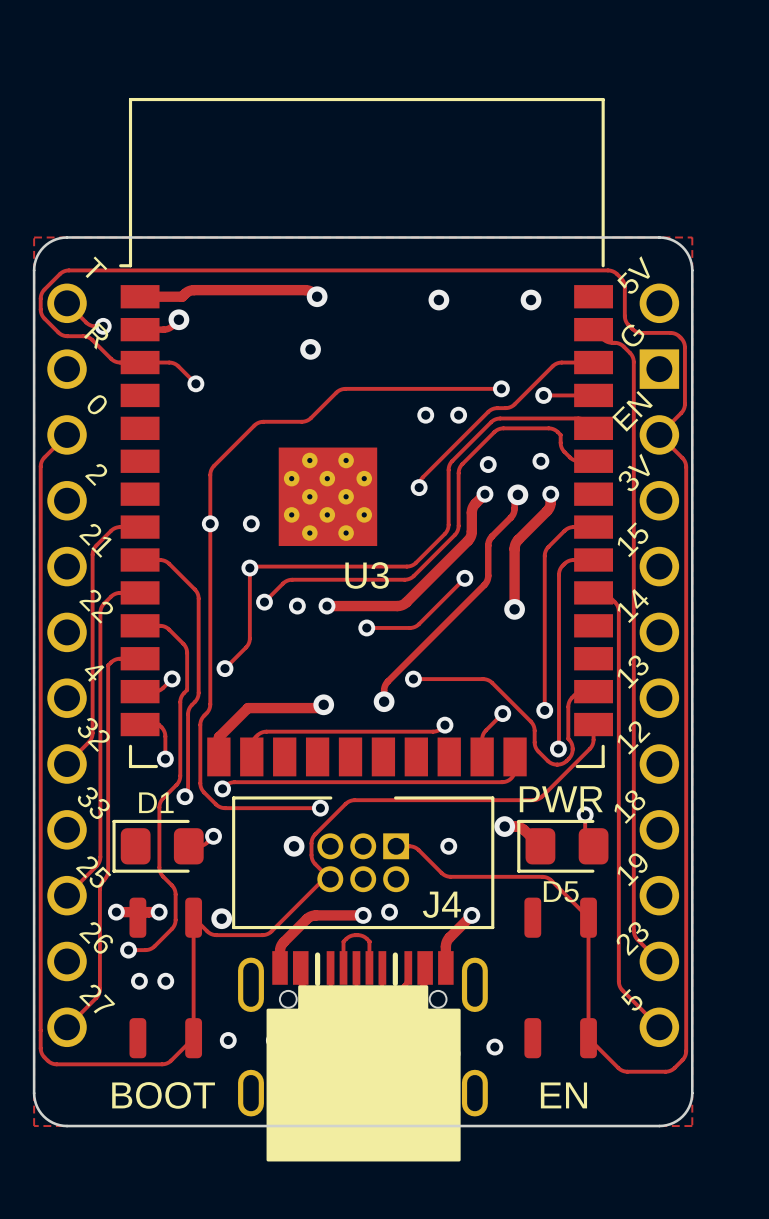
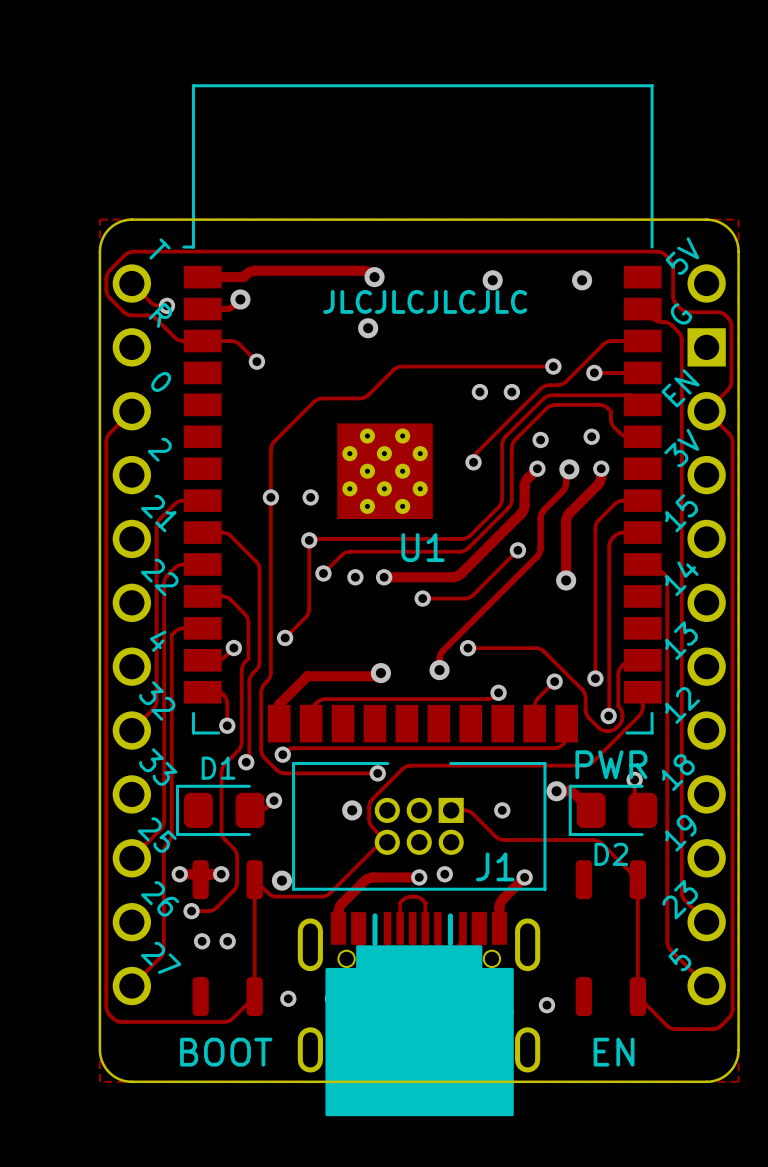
drawing: none -> [323, 289, 528, 314]
U3 name: U3 (367, 575) -> U1 (423, 547)
D5 name: D5 (561, 891) -> D2 (611, 854)
J4 name: J4 (441, 904) -> J1 (495, 866)

